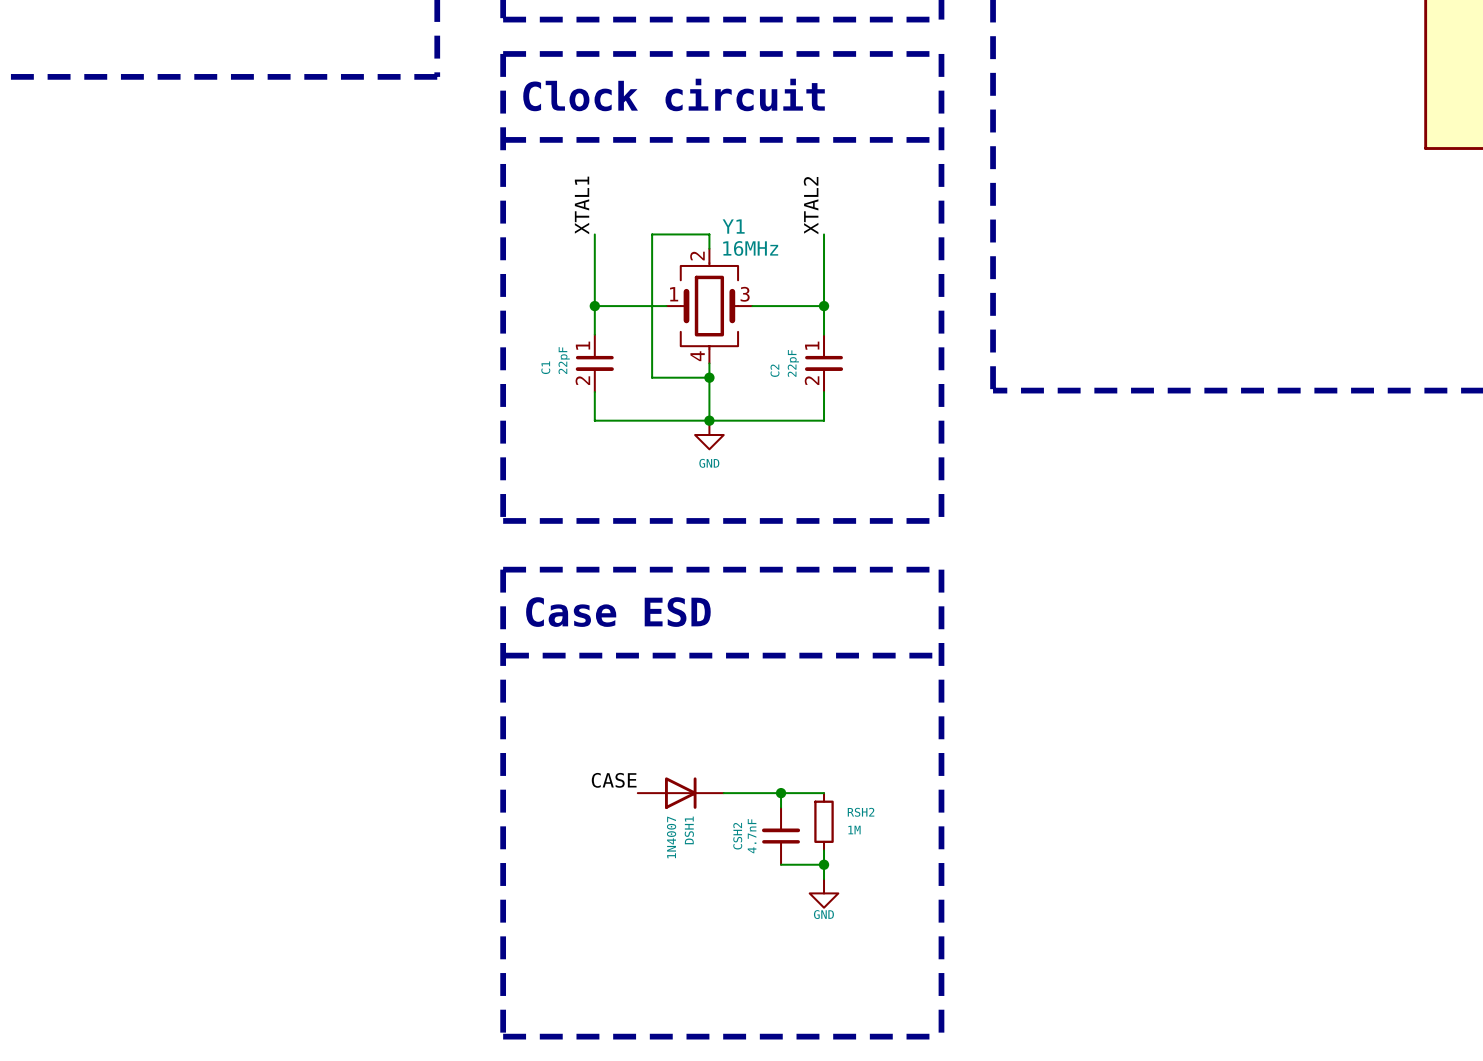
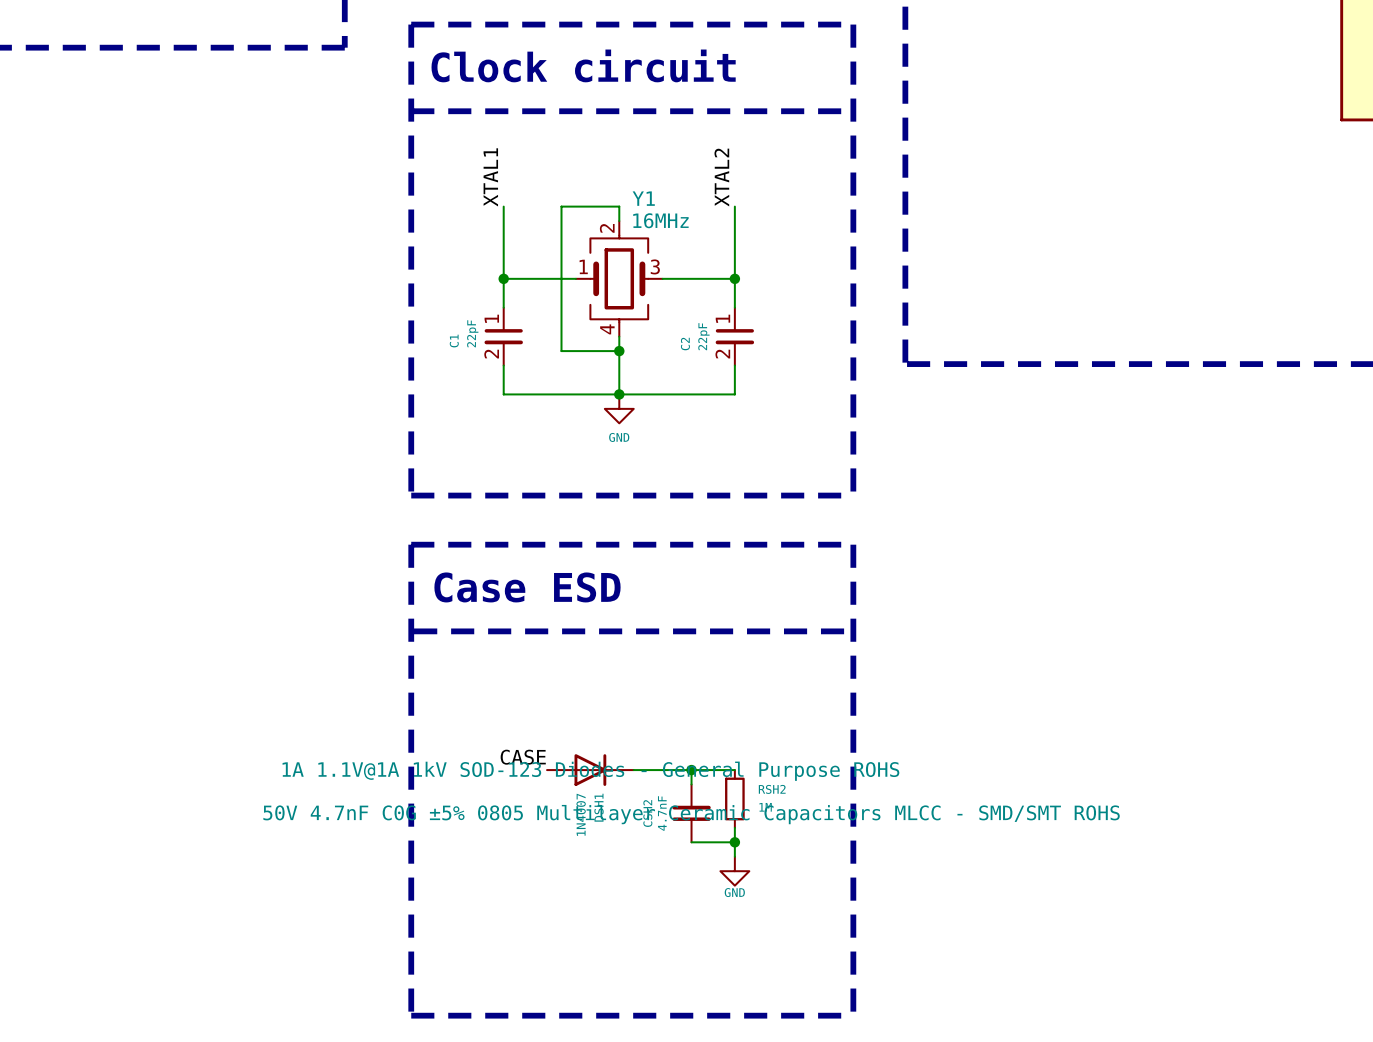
DSH1 text: none -> 1A 1.1V@1A 1kV SOD-123 Diodes - General Purpose ROHS (590, 771)
CSH2 text: none -> 50V 4.7nF C0G ±5% 0805 Multilayer Ceramic Capacitors MLCC - SMD/SMT ROHS (691, 814)

